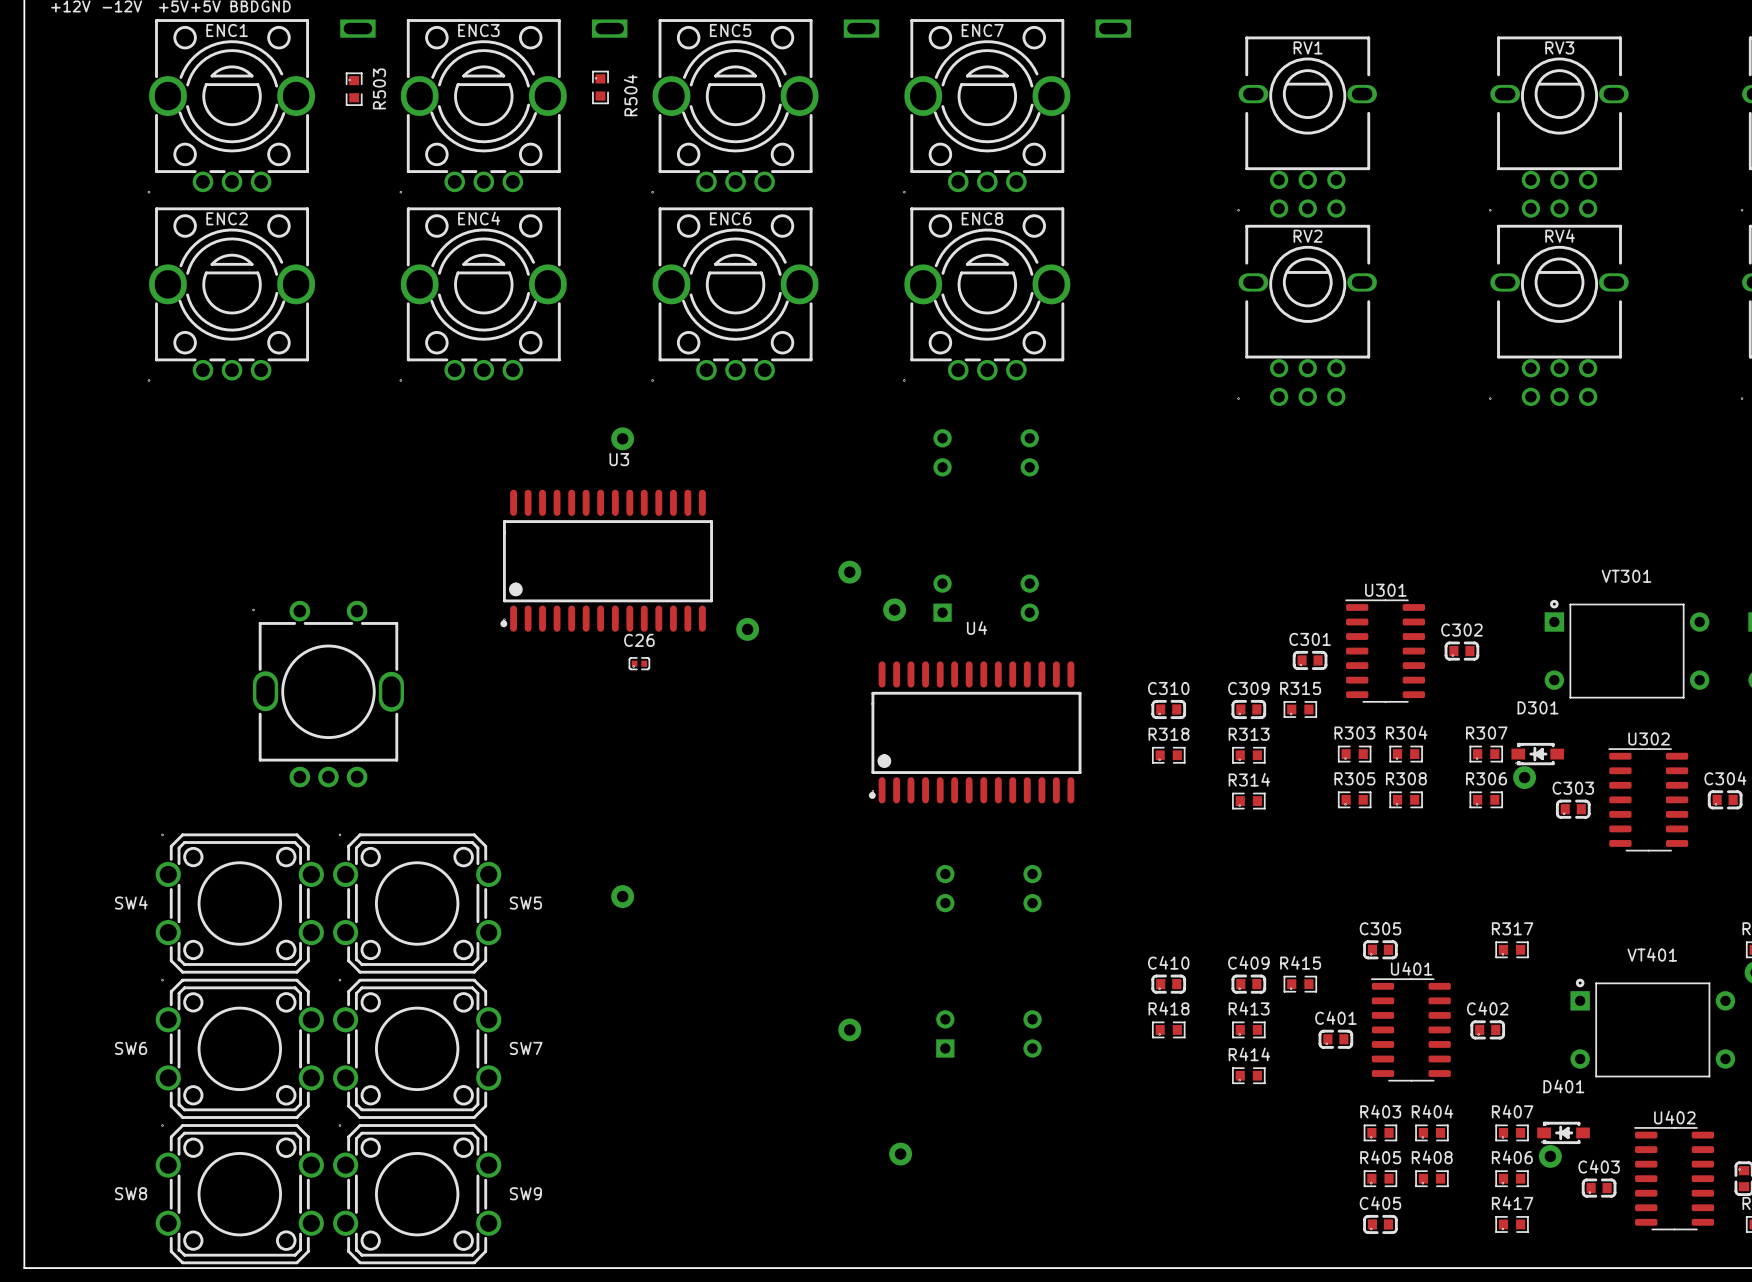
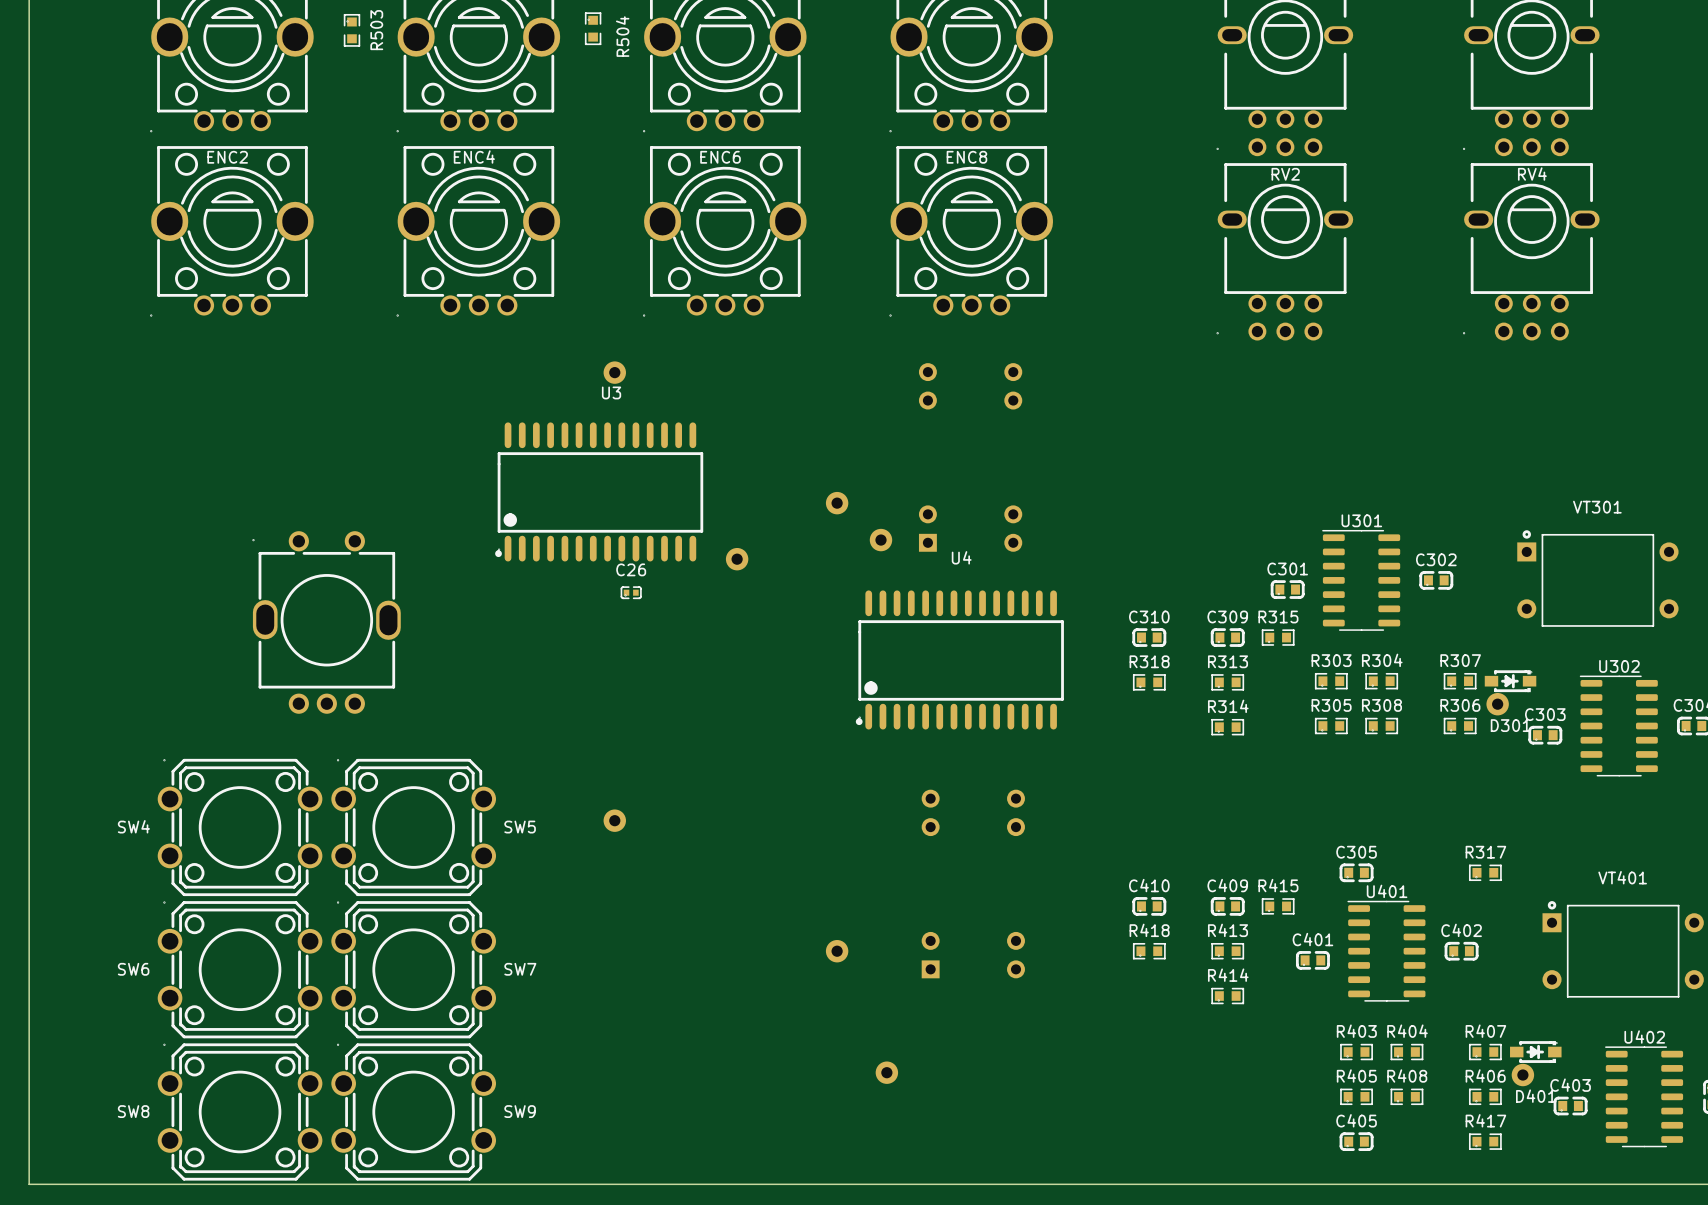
D301 rotation: 0° (1537, 754) -> 180° (1510, 681)
D401 rotation: 0° (1563, 1132) -> 180° (1535, 1052)

